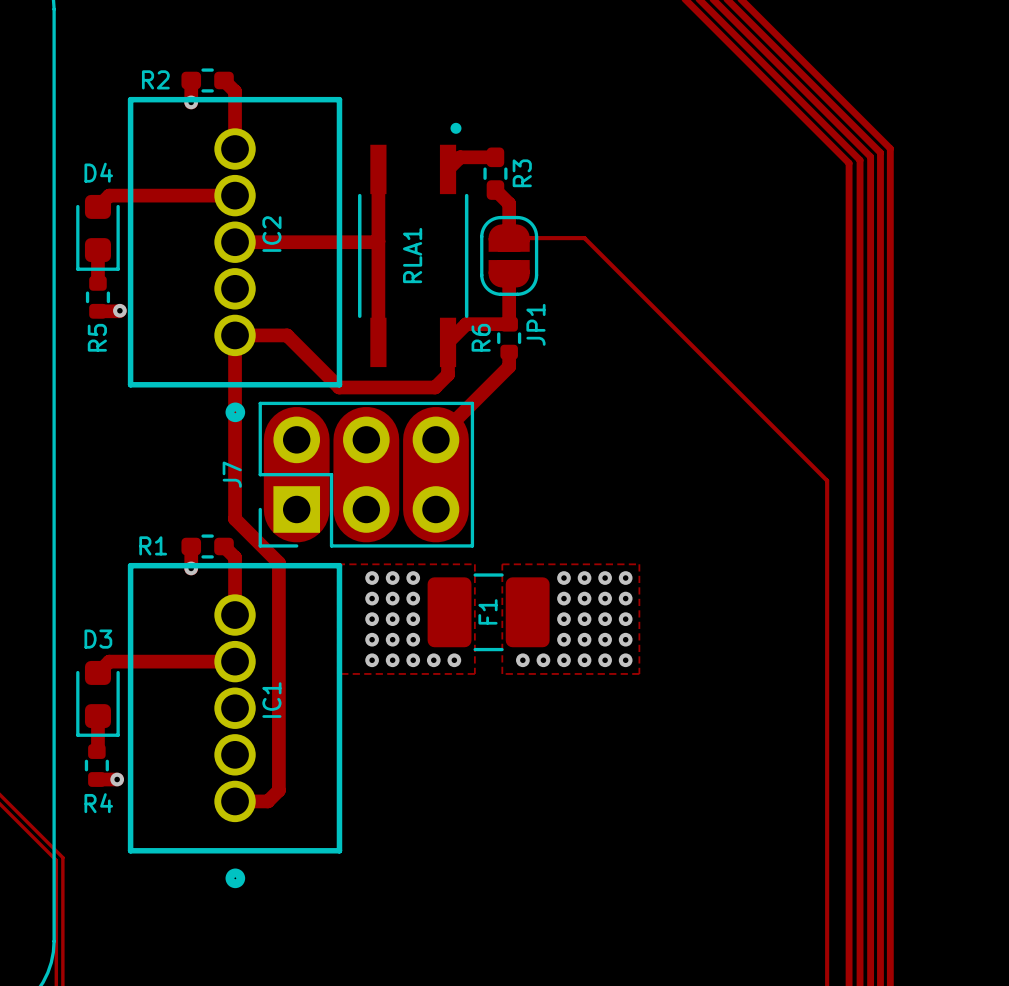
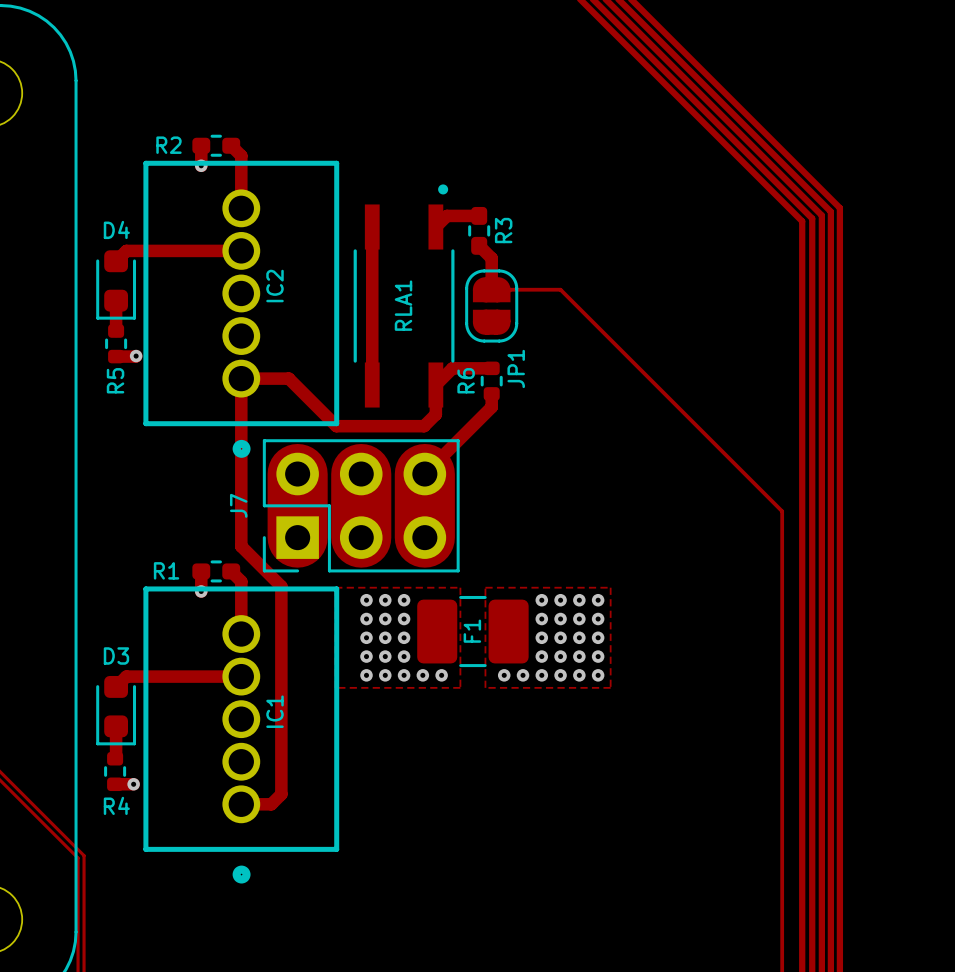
track: (378, 241) (235, 242) -> none
track: (509, 273) (509, 324) -> none

